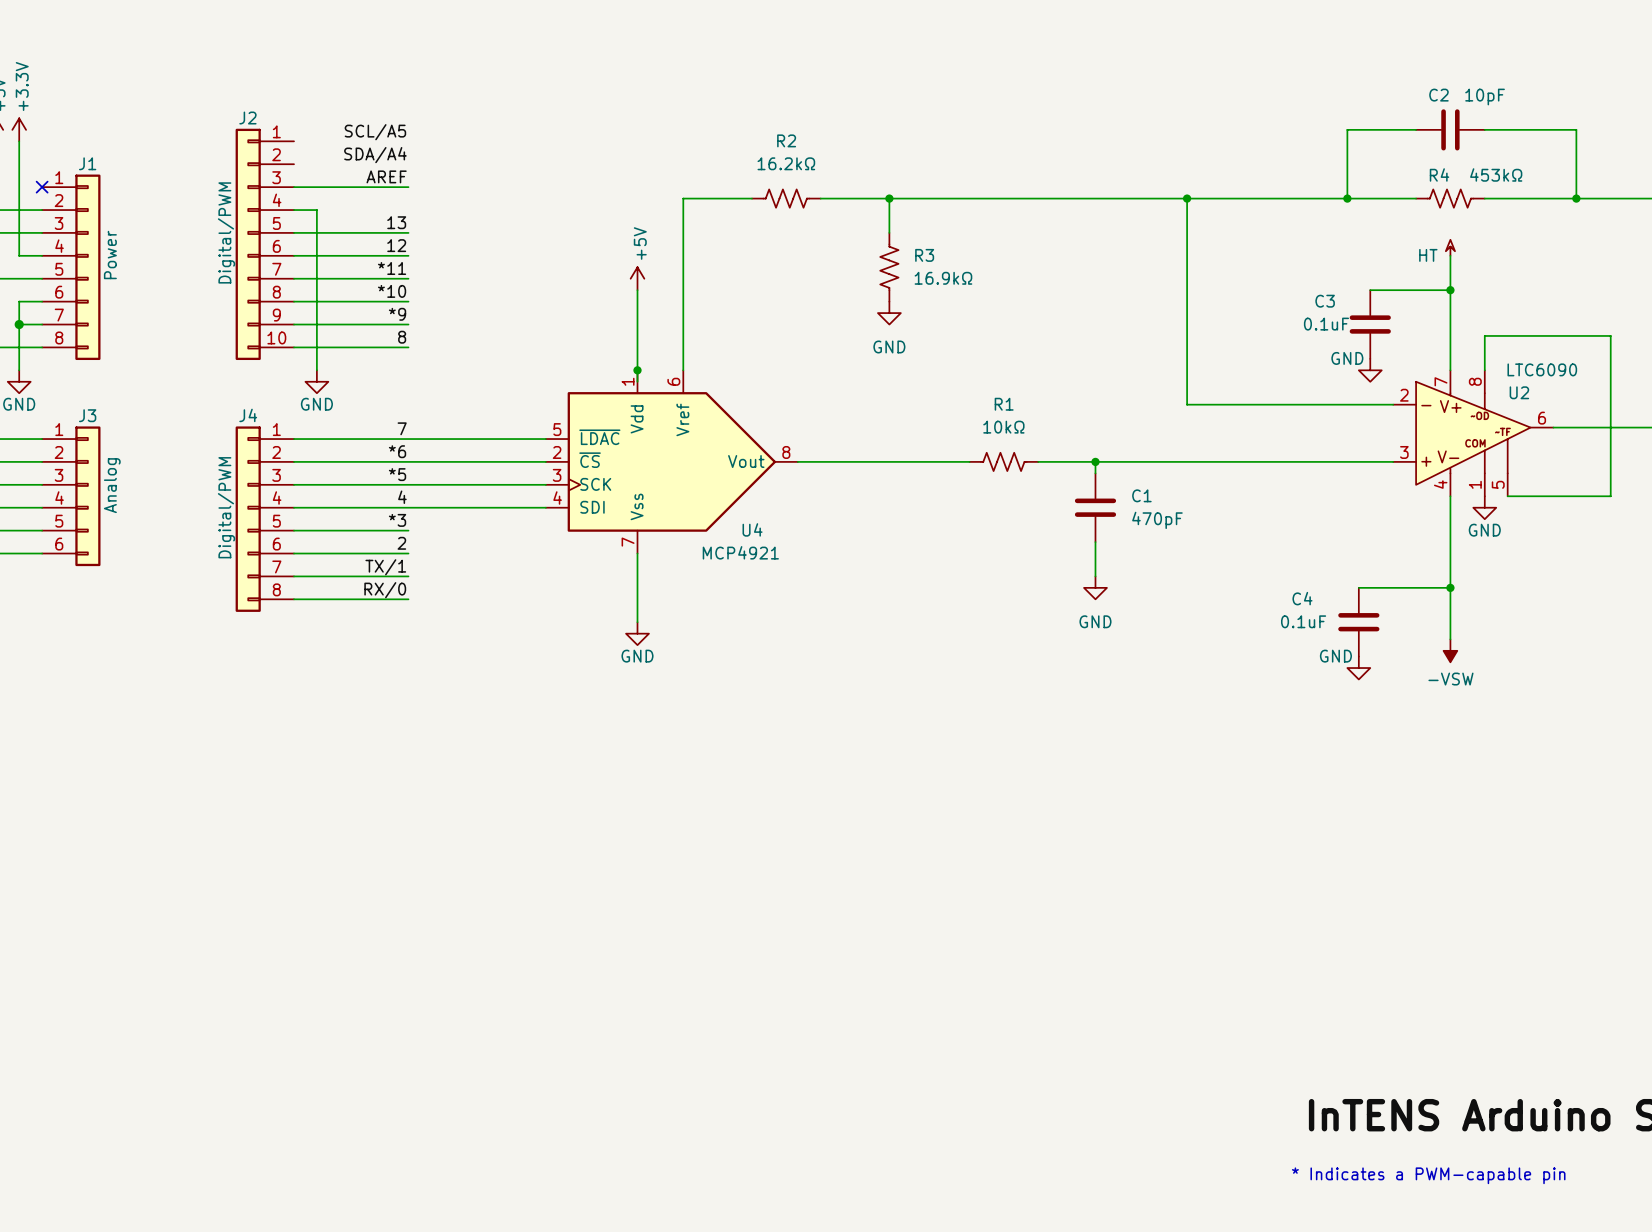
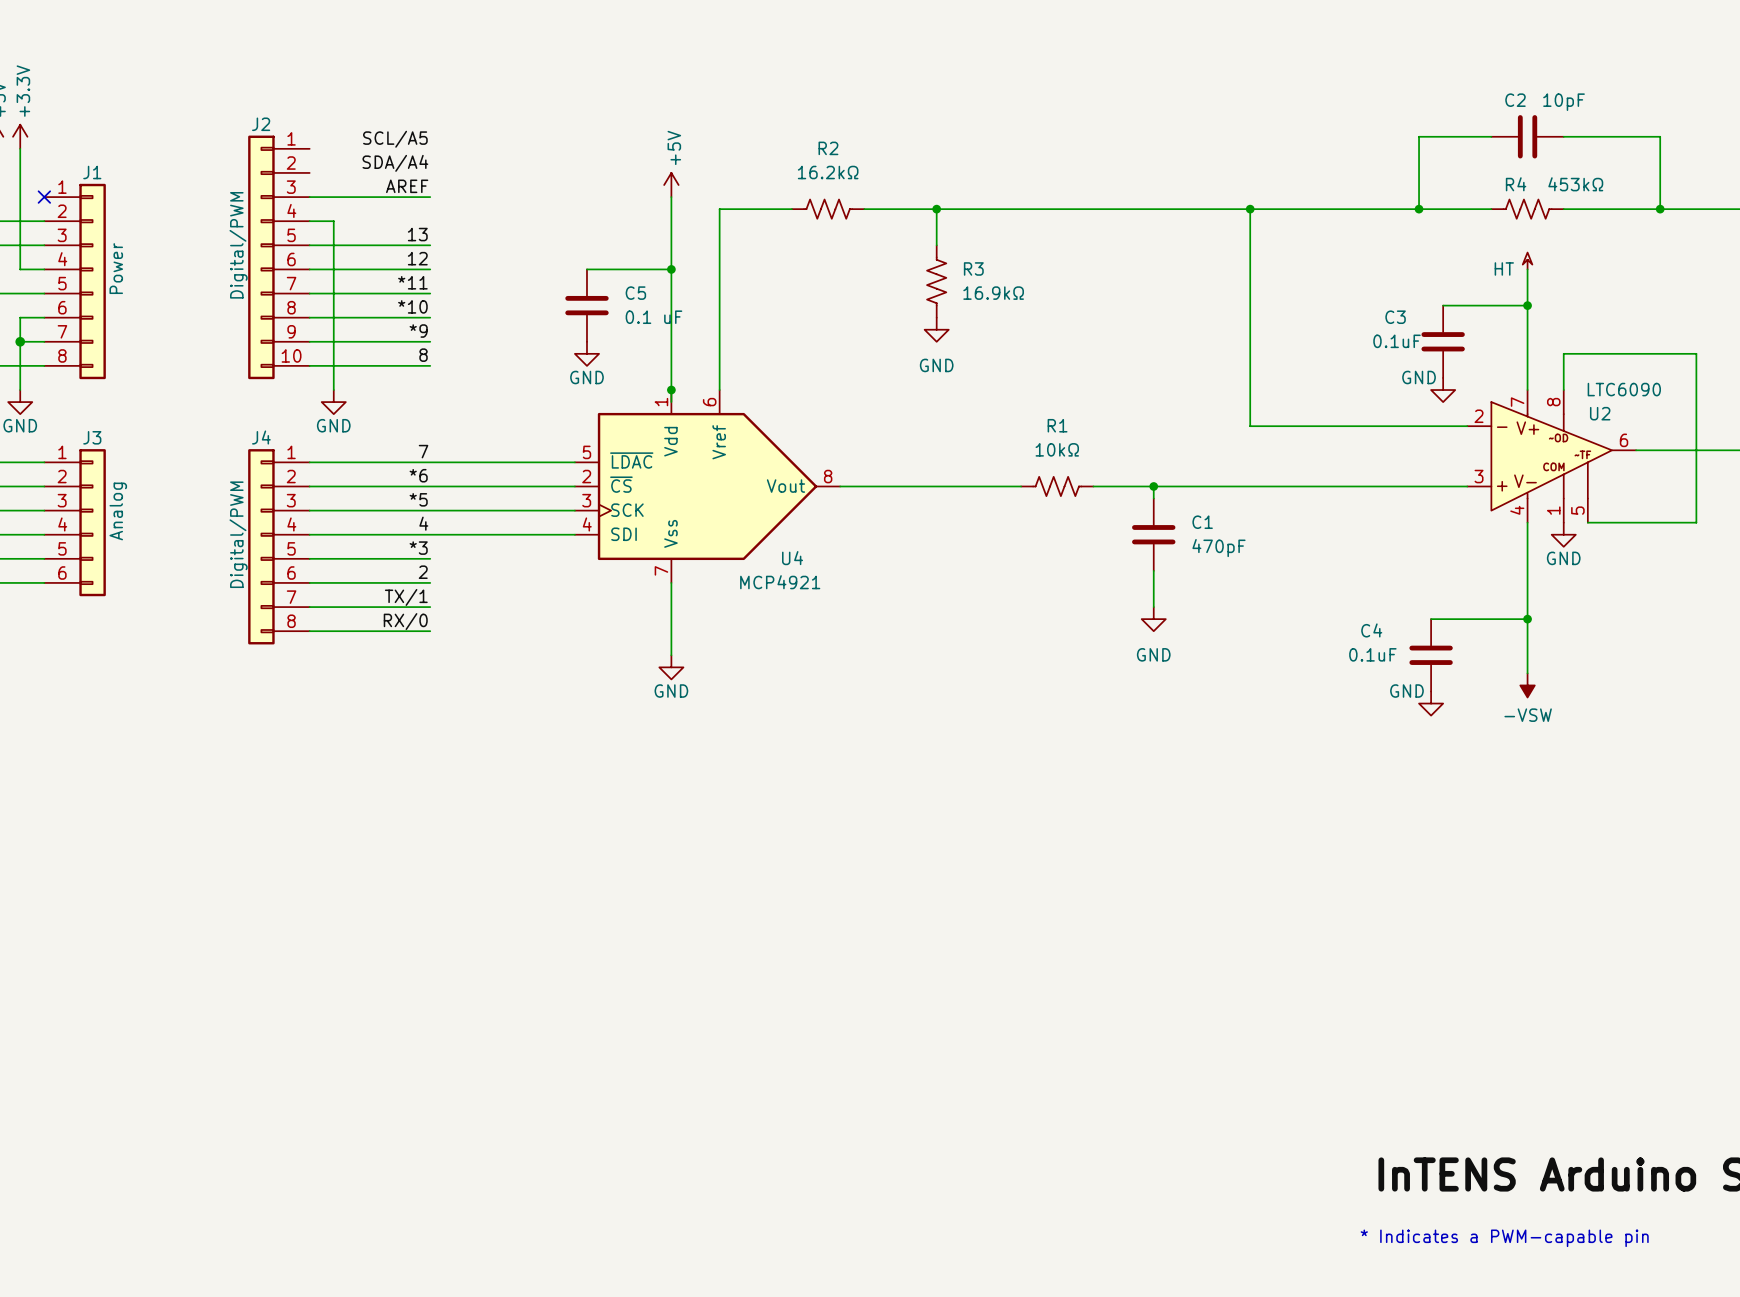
wire: none -> (671, 197) (671, 305)
wire: none -> (586, 269) (671, 269)
junction: none -> (671, 269)
power symbol position: +5V (637, 278) -> +5V (671, 185)
C5: none -> 0.1 uF (586, 305)
power symbol: none -> GND (586, 353)

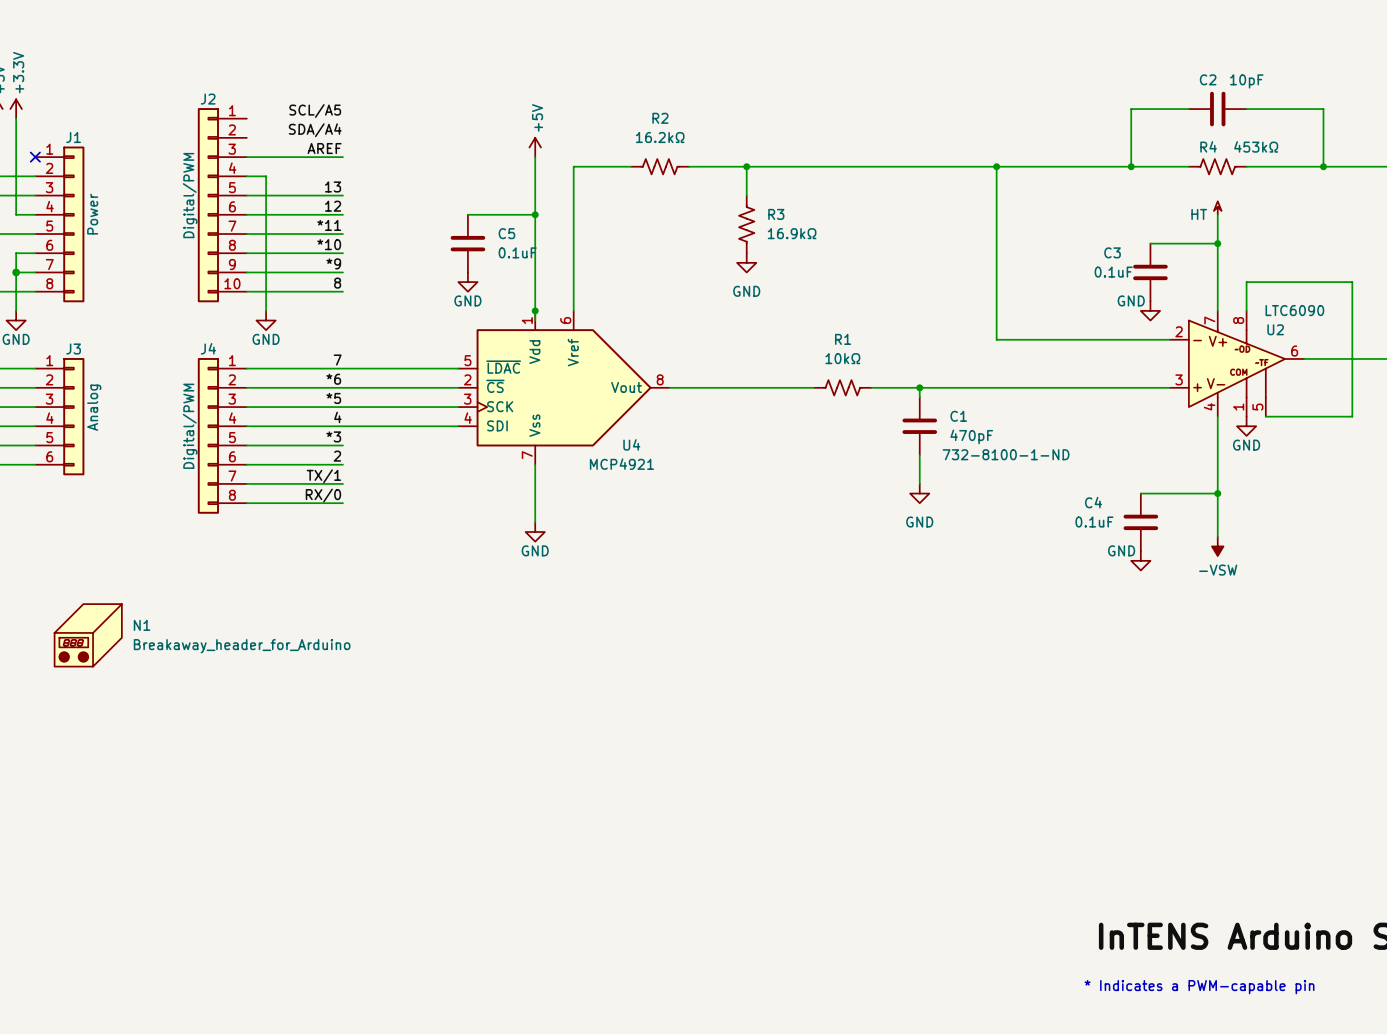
C5 value: 0.1 uF (653, 317) -> 0.1uF (517, 252)
C1 text: none -> 732-8100-1-ND (1006, 454)
N1: none -> Breakaway_header_for_Arduino (88, 635)

